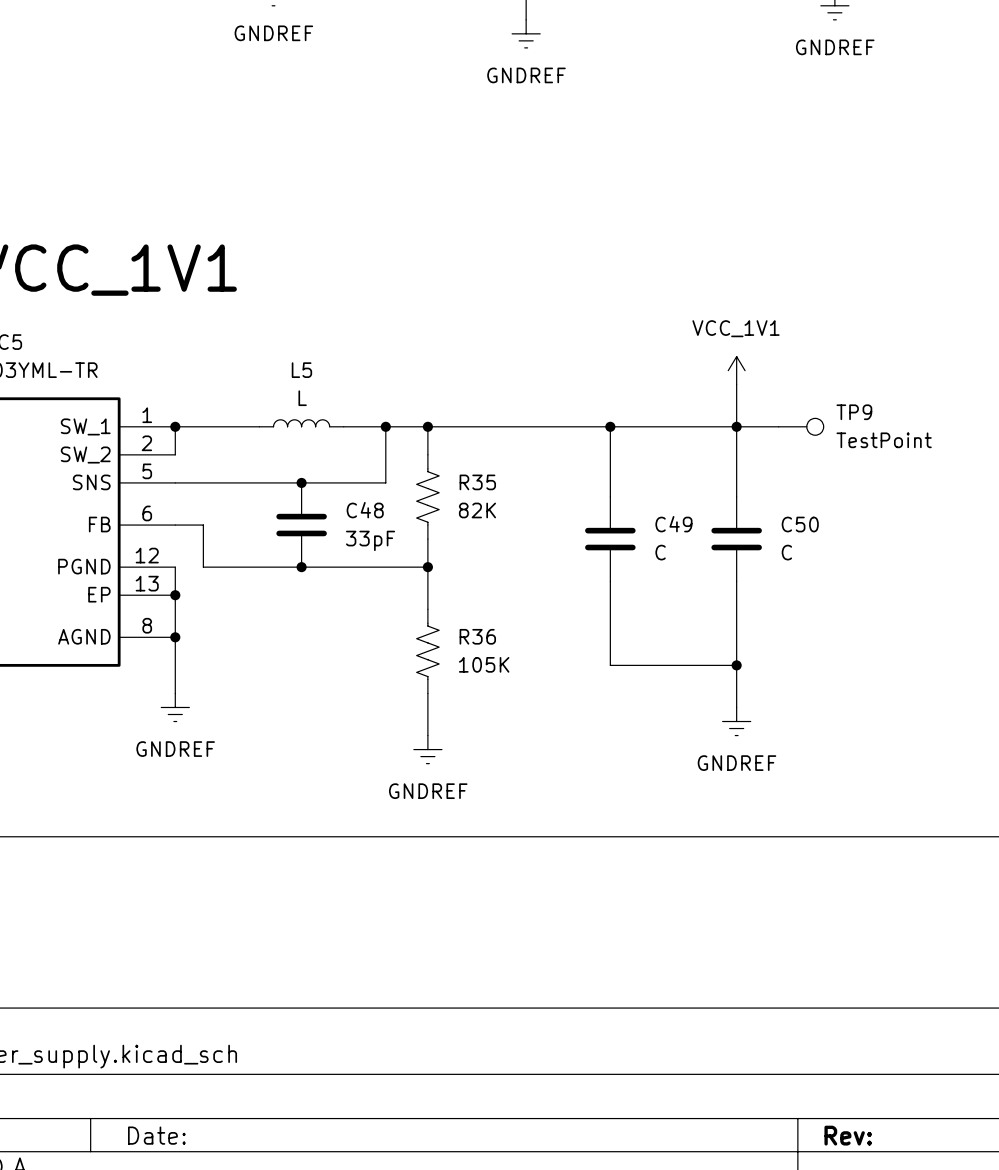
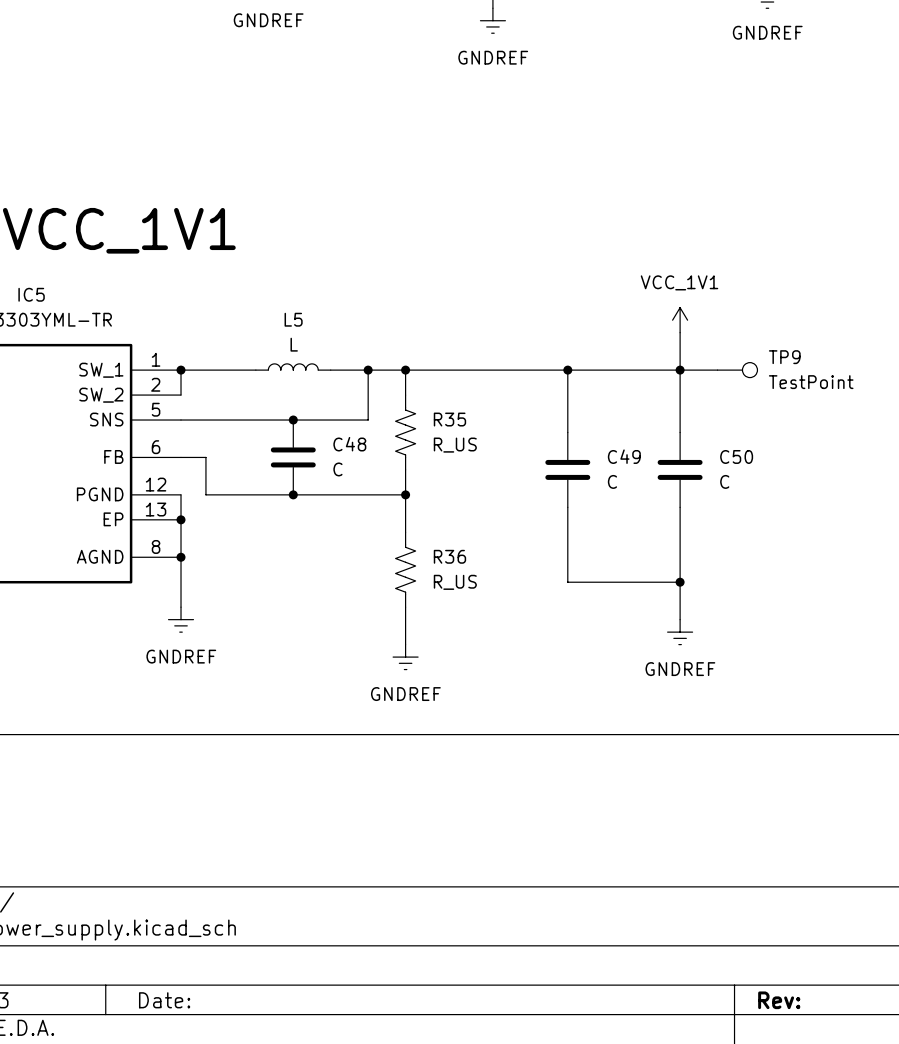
R35 value: 82K (477, 510) -> R_US (455, 445)
C48 value: 33pF (370, 540) -> C (337, 469)
R36 value: 105K (484, 664) -> R_US (455, 582)

